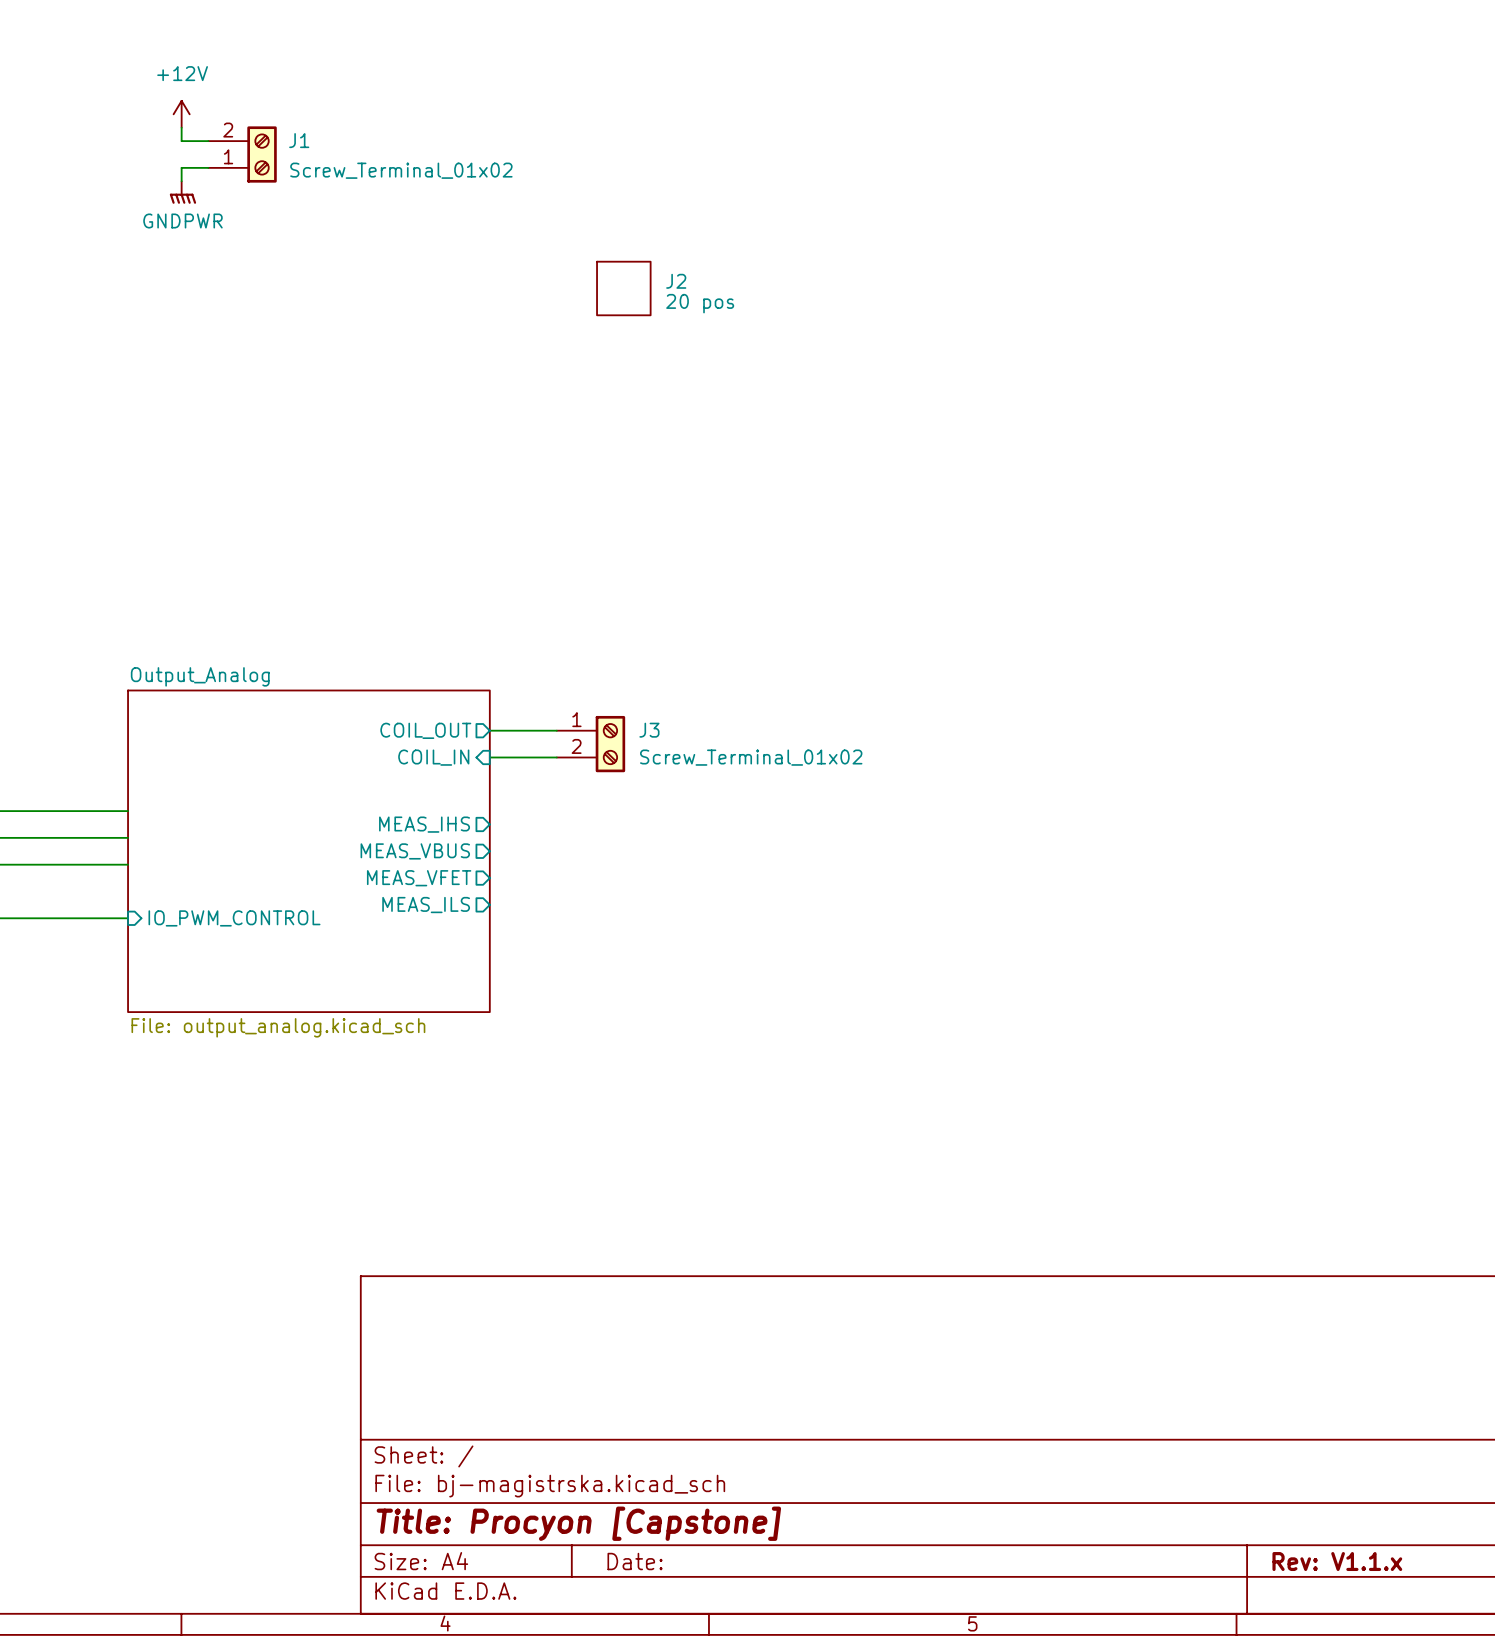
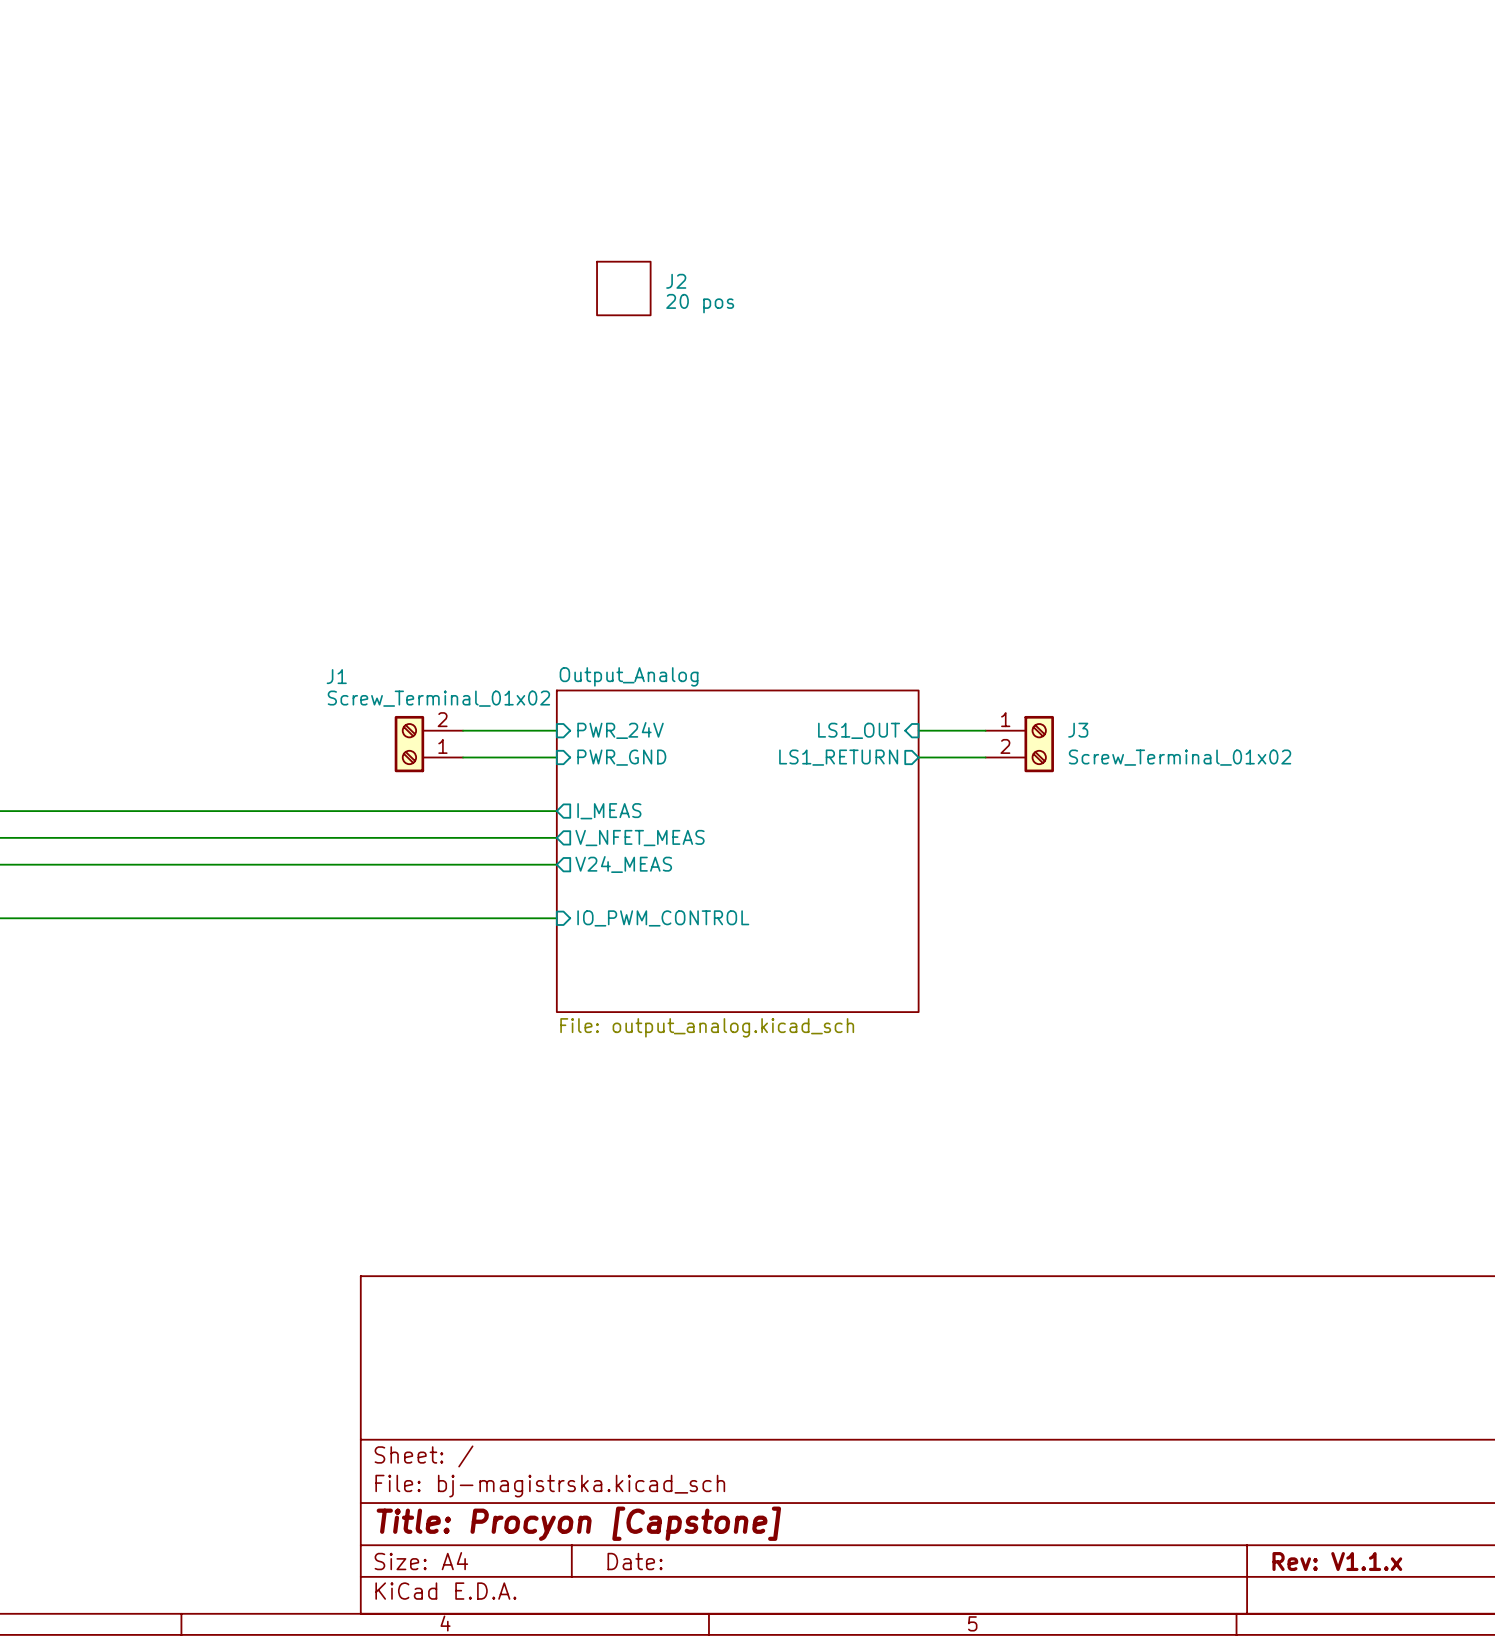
power symbol: +12V (181, 114) -> none
wire: (181, 127) (181, 141) (208, 141) -> none
J1 name position: J1 (299, 140) -> J1 (336, 676)
J1 position: (242, 154) -> (428, 744)
J1 flip: as is (262, 154) -> left-right (409, 744)
wire: (208, 167) (181, 167) (181, 181) -> none
J1 value position: Screw_Terminal_01x02 (401, 170) -> Screw_Terminal_01x02 (438, 698)
power symbol: GNDPWR (182, 192) -> none
sheet pin: COIL_OUT (425, 730) -> none
wire: none -> (463, 730) (489, 730)
sheet pin: none -> PWR_24V (620, 730)
sheet pin: none -> LS1_OUT (859, 730)
wire: none -> (918, 730) (985, 730)
J3 position: (591, 744) -> (1019, 744)
sheet pin: COIL_IN (433, 757) -> none
wire: none -> (463, 757) (489, 757)
sheet pin: none -> PWR_GND (621, 757)
sheet pin: none -> LS1_RETURN (838, 757)
wire: none -> (918, 757) (985, 757)
wire: none -> (128, 811) (556, 811)
sheet pin: none -> I_MEAS (609, 811)
sheet pin: MEAS_IHS (424, 824) -> none
wire: none -> (128, 837) (556, 837)
sheet pin: none -> V_NFET_MEAS (639, 838)
sheet Output_Analog: File: output_analog.kicad_sch (308, 851) -> none
sheet pin: MEAS_VBUS (415, 851) -> none
sheet Output_Analog: none -> File: output_analog.kicad_sch (737, 851)
wire: none -> (128, 864) (556, 864)
sheet pin: none -> V24_MEAS (623, 864)
sheet pin: MEAS_VFET (419, 878) -> none
sheet pin: MEAS_ILS (426, 905) -> none
wire: none -> (128, 918) (556, 918)
sheet pin: IO_PWM_CONTROL (234, 918) -> none
sheet pin: none -> IO_PWM_CONTROL (663, 918)

